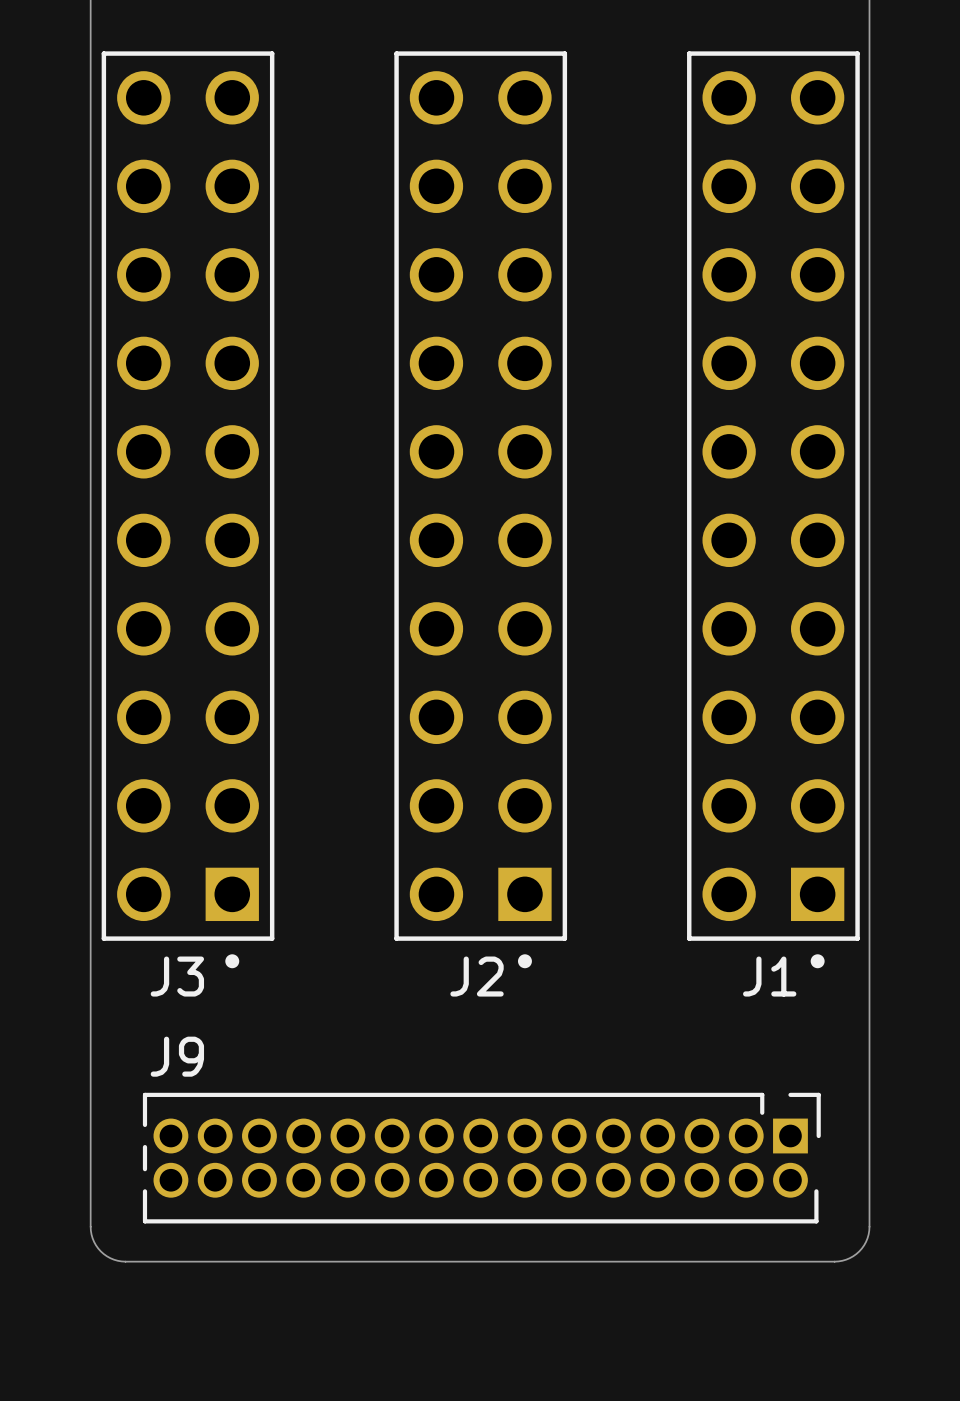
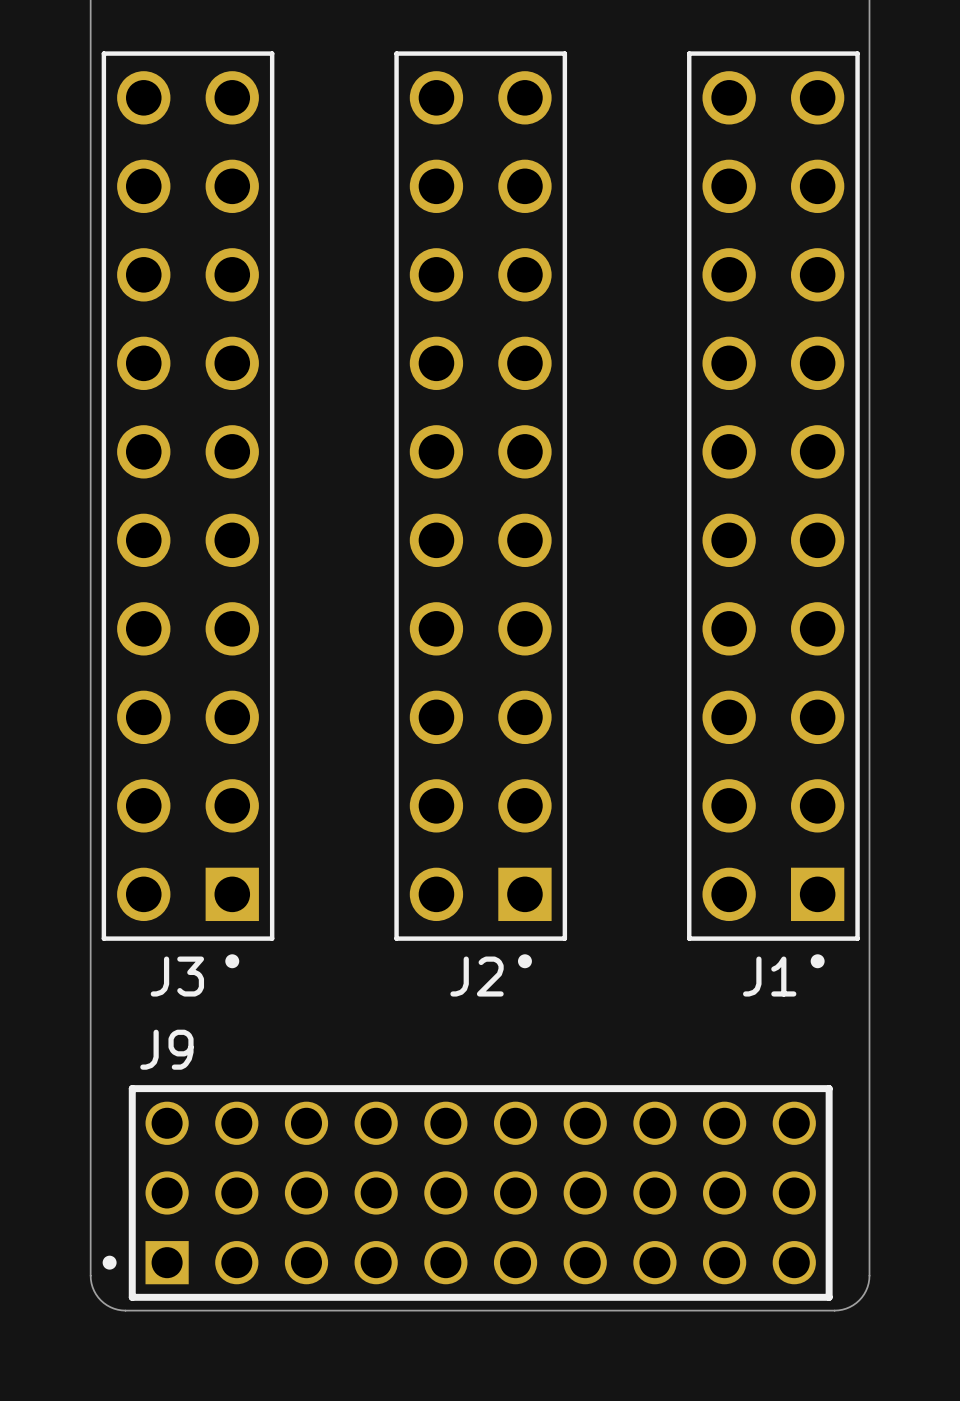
J9 footprint: [142, 1092, 821, 1224] -> [102, 1085, 833, 1301]
board edge: (90, 1226) (94, 1241) (100, 1251) (110, 1258) (125, 1261) (834, 1261) (846, 1259) (859, 1251) (867, 1238) (869, 1226) -> (90, 1226) (90, 1275) (94, 1290) (106, 1305) (125, 1310) (838, 1310) (856, 1303) (867, 1287) (869, 1275) (869, 1226)

